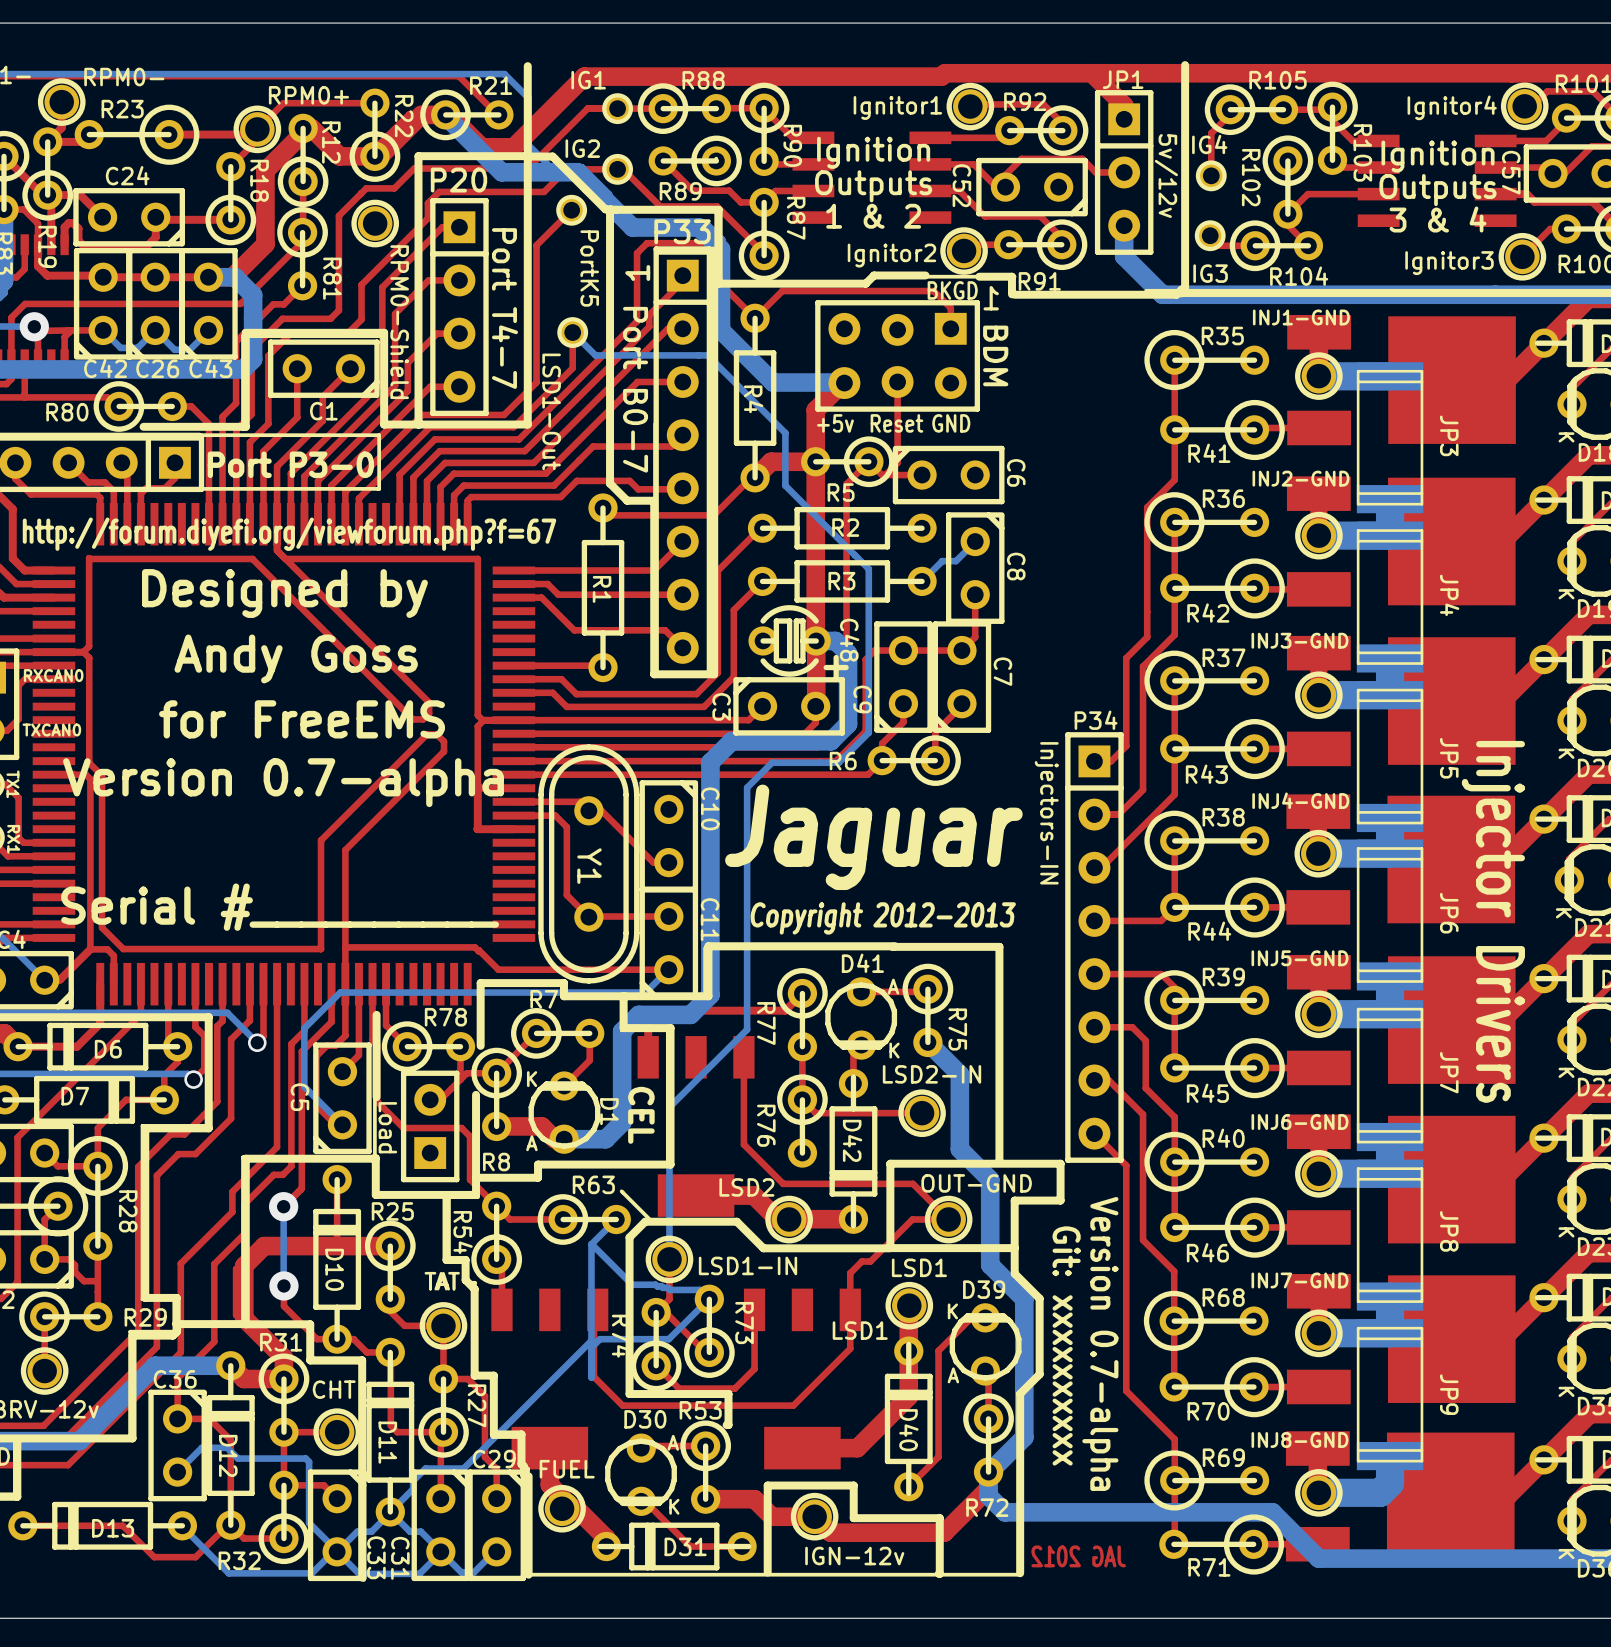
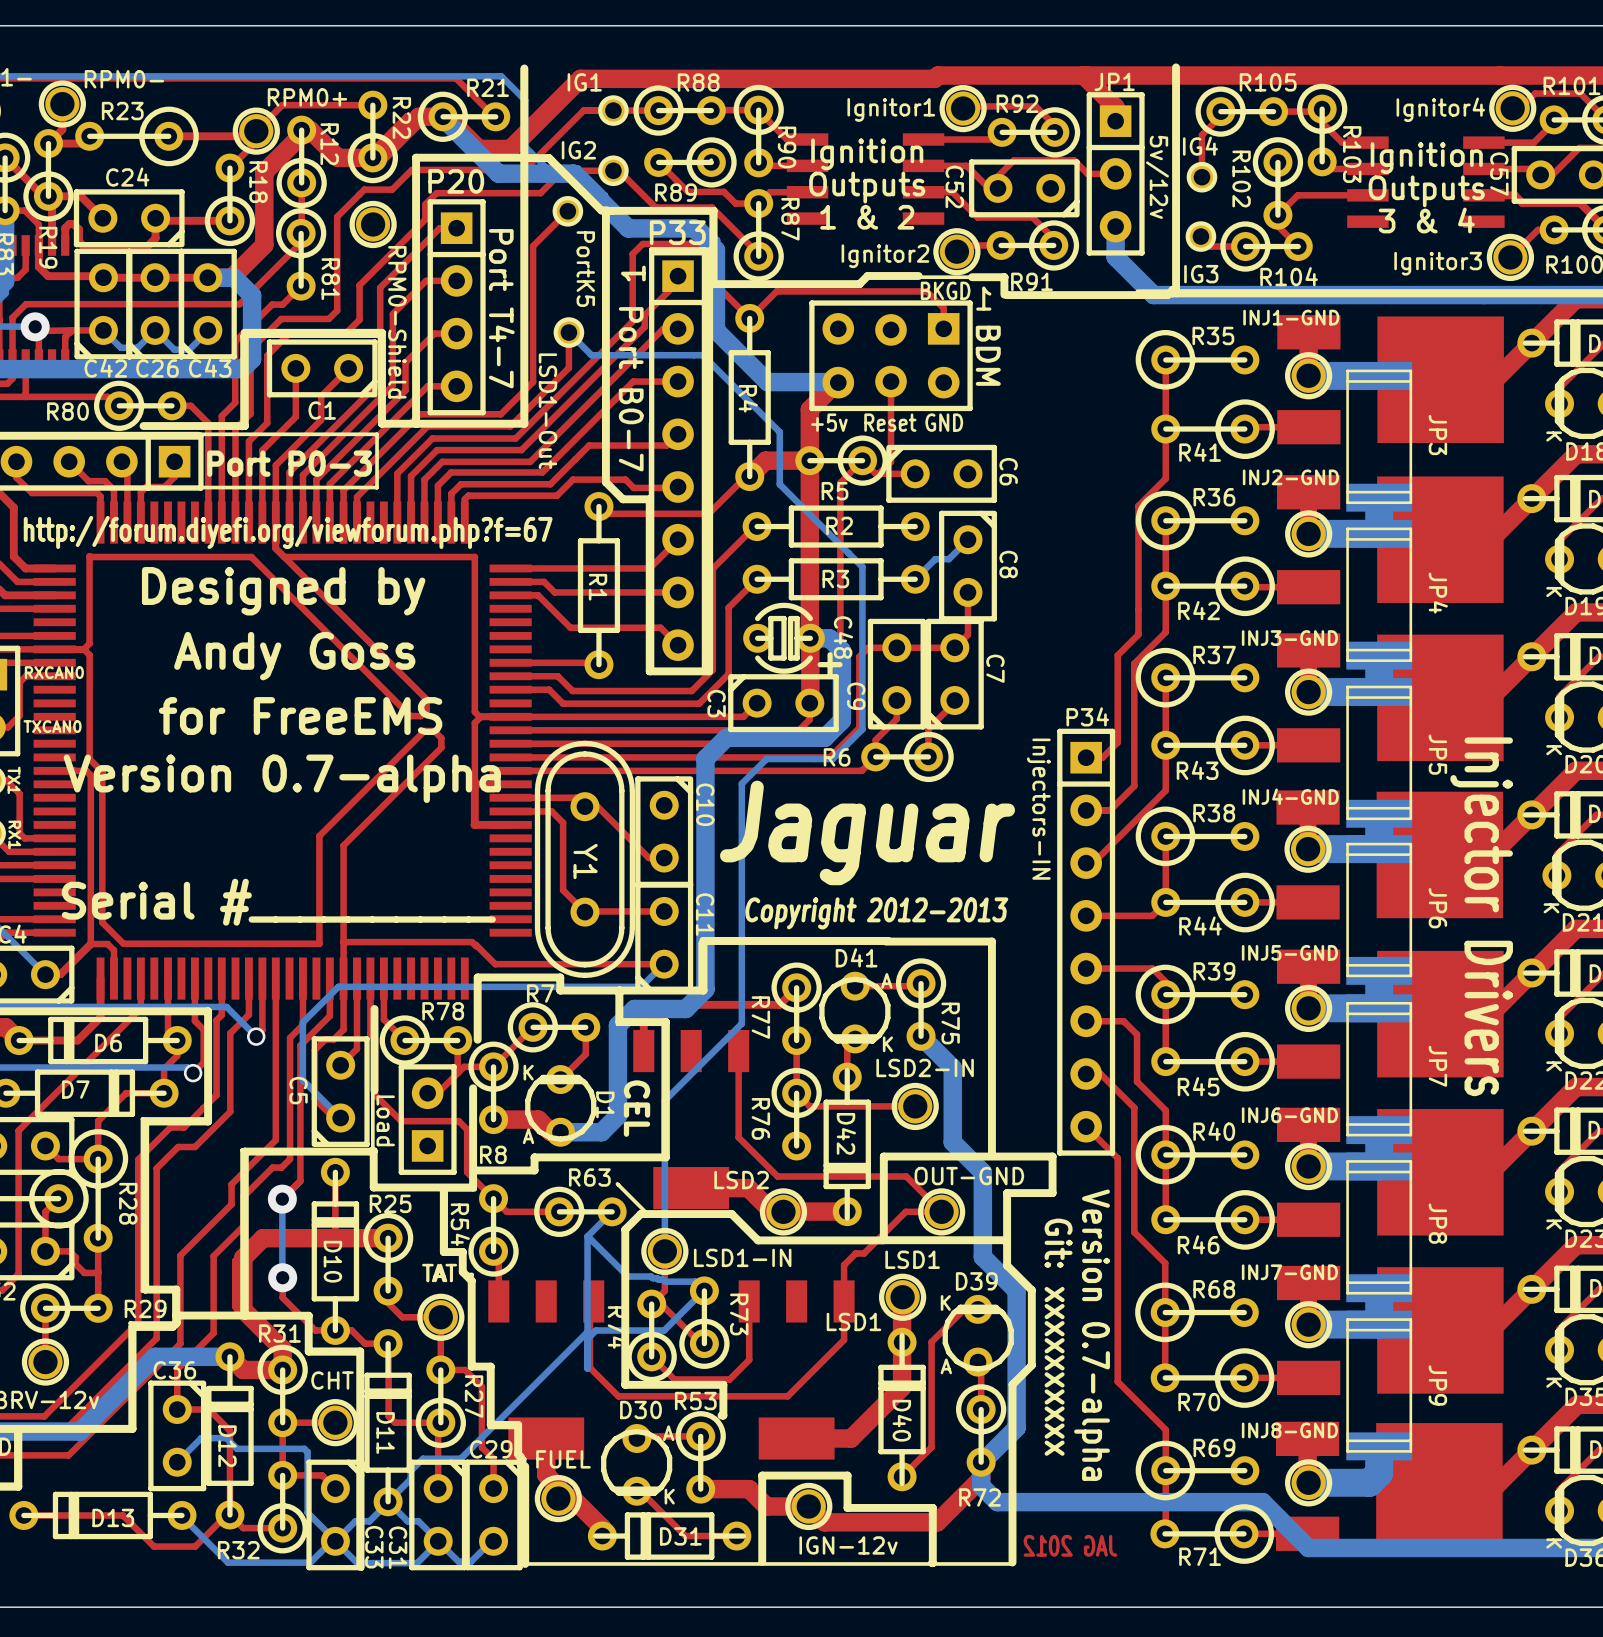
part value: Port P3-0 (290, 464) -> Port P0-3 (289, 463)

